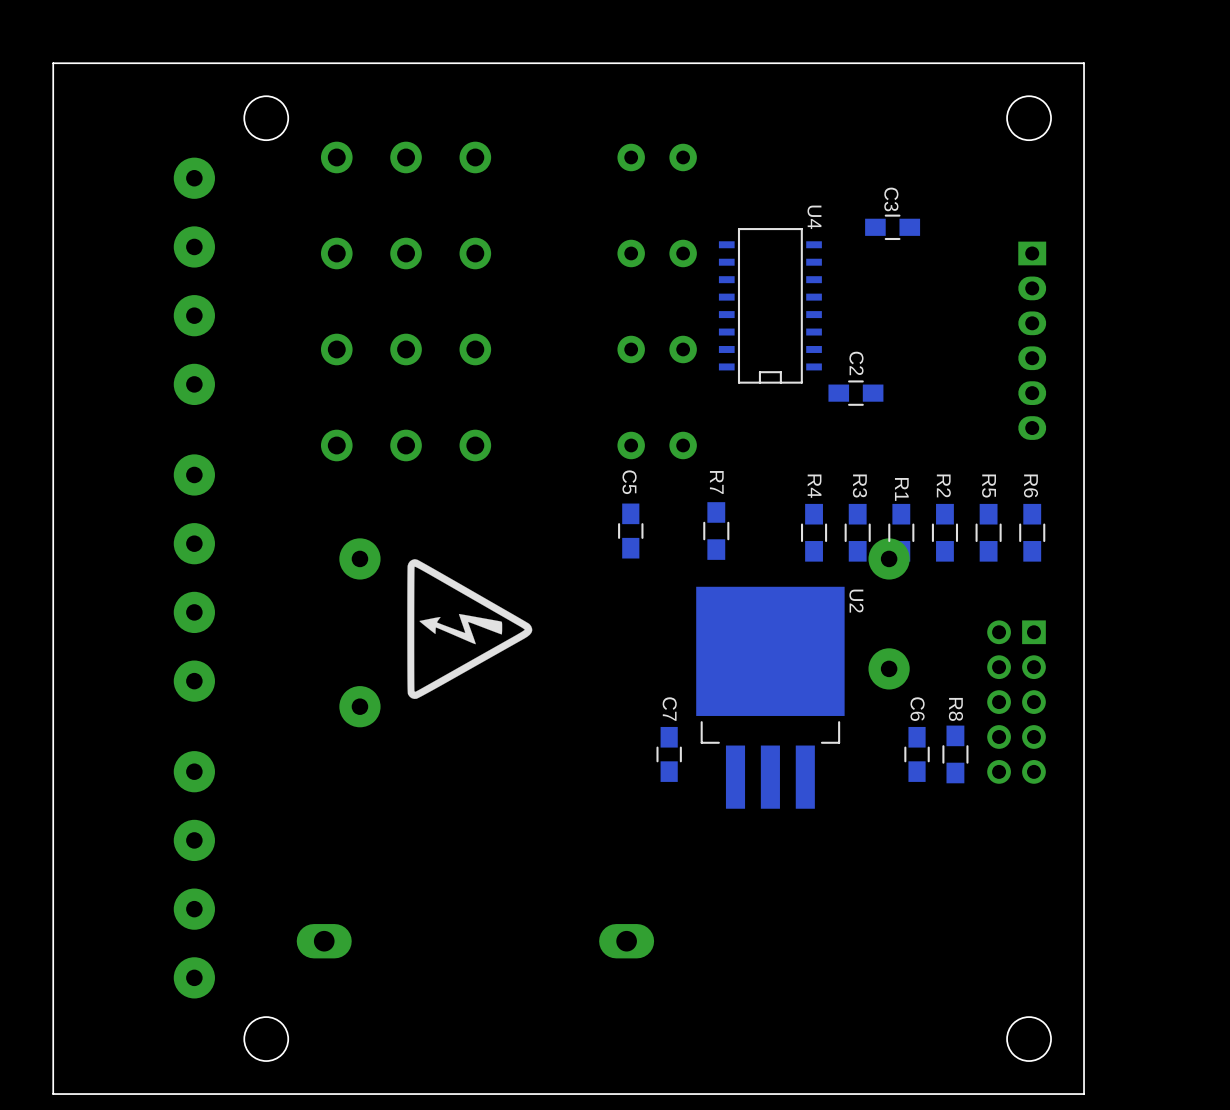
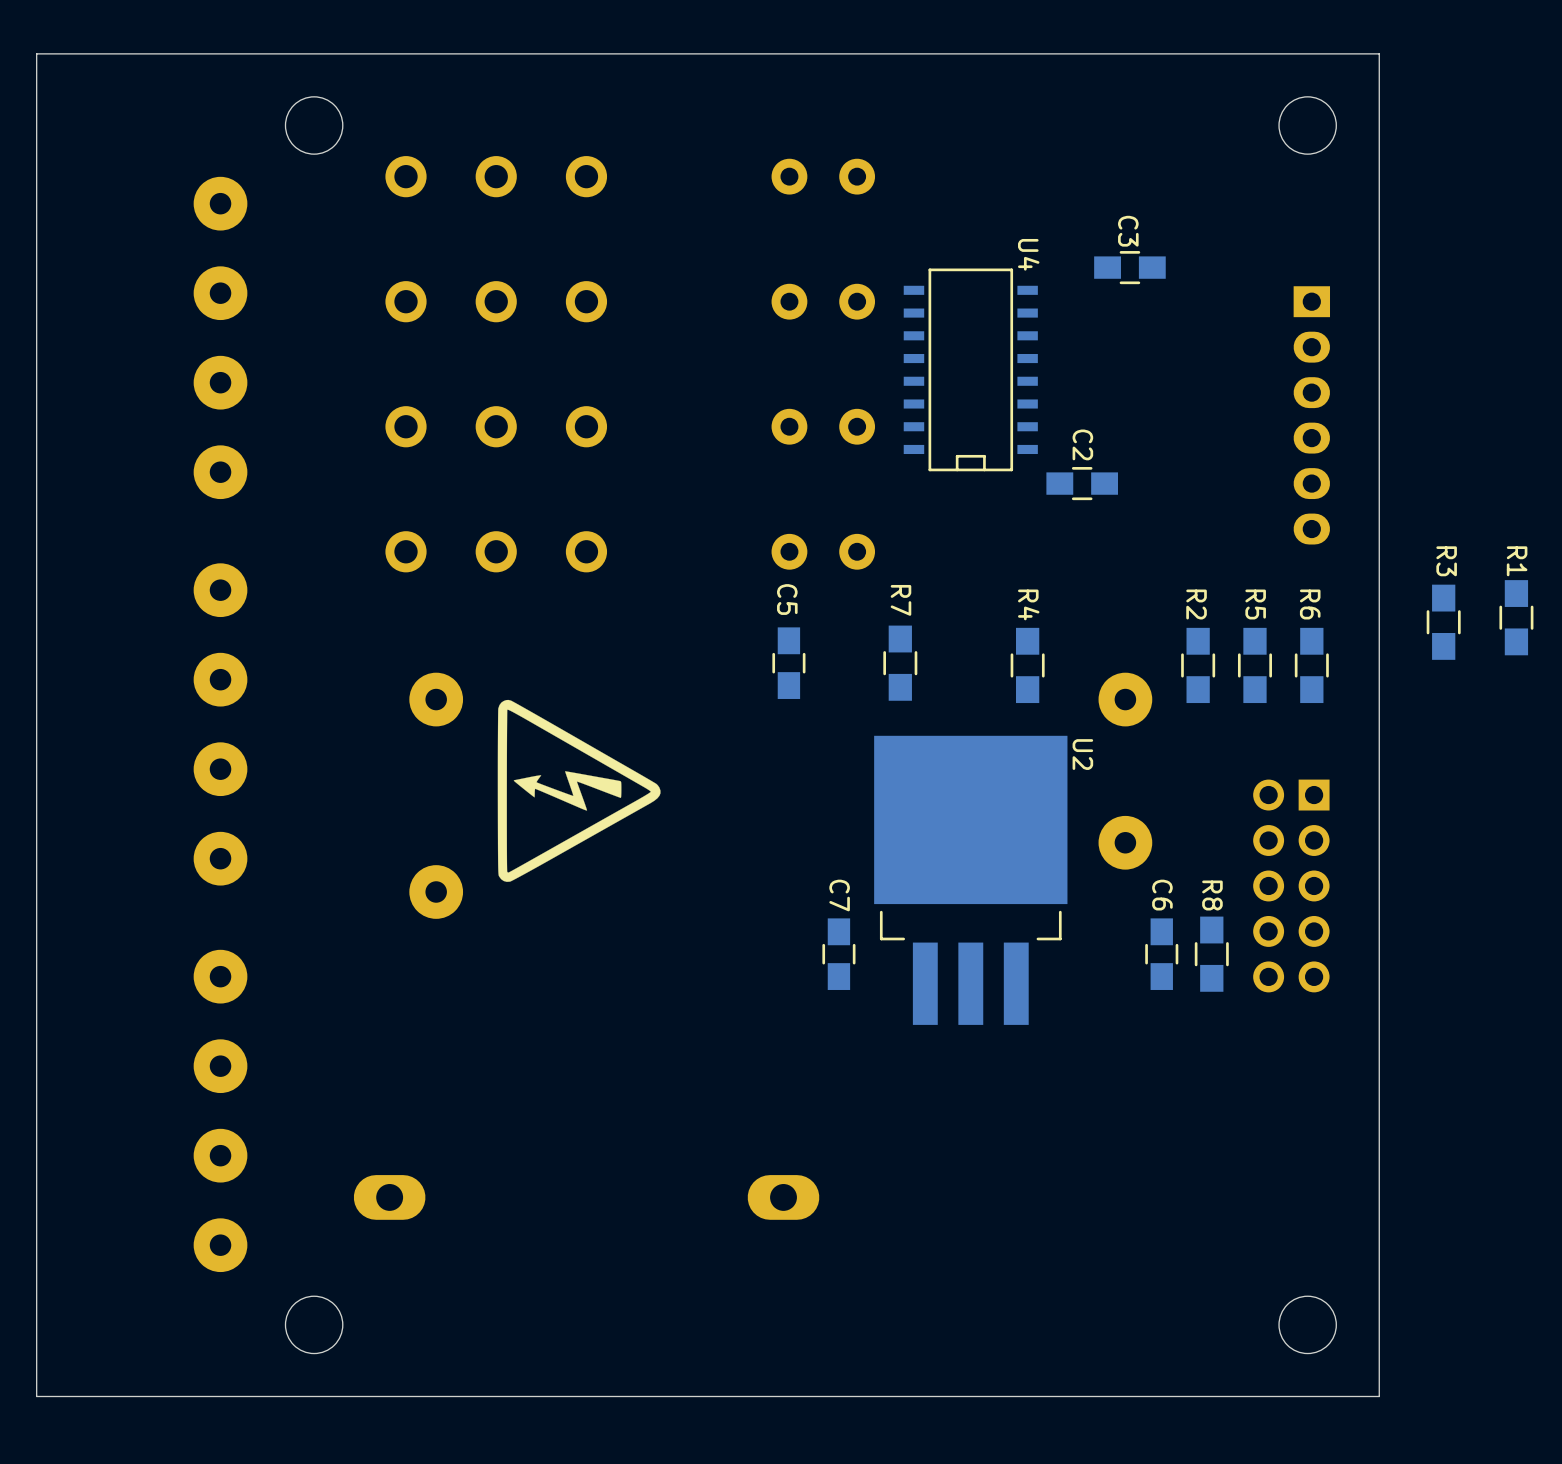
R3 position: (857, 532) -> (1443, 622)
R1 position: (901, 532) -> (1516, 617)

